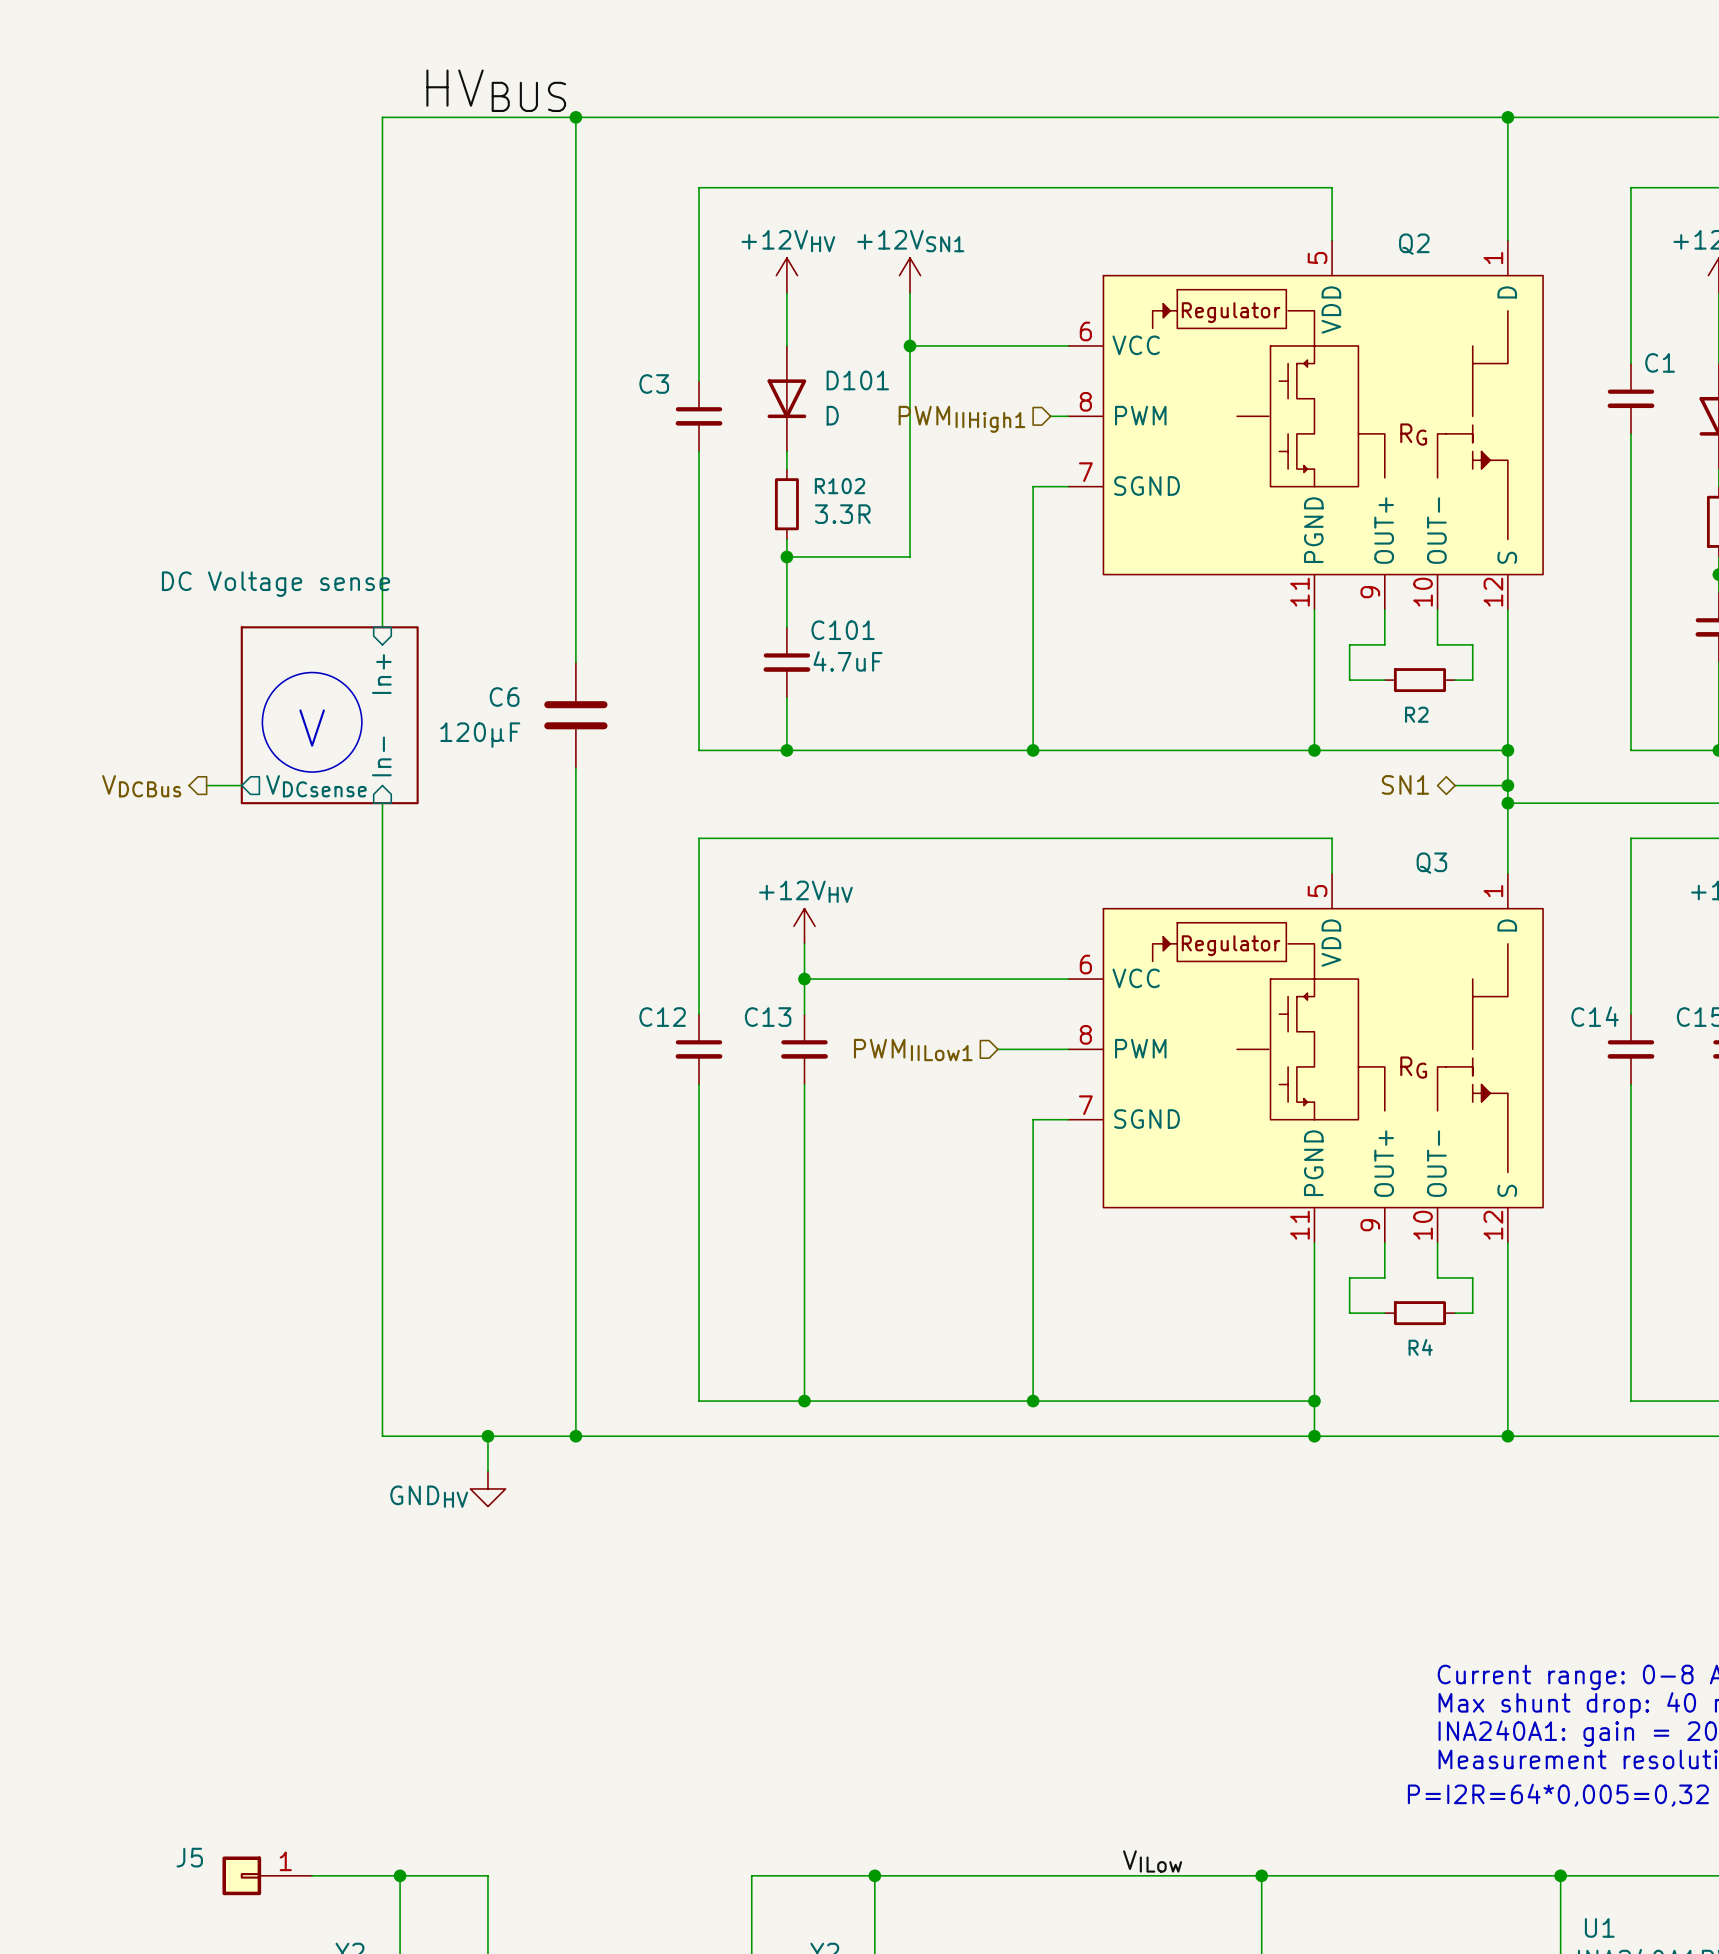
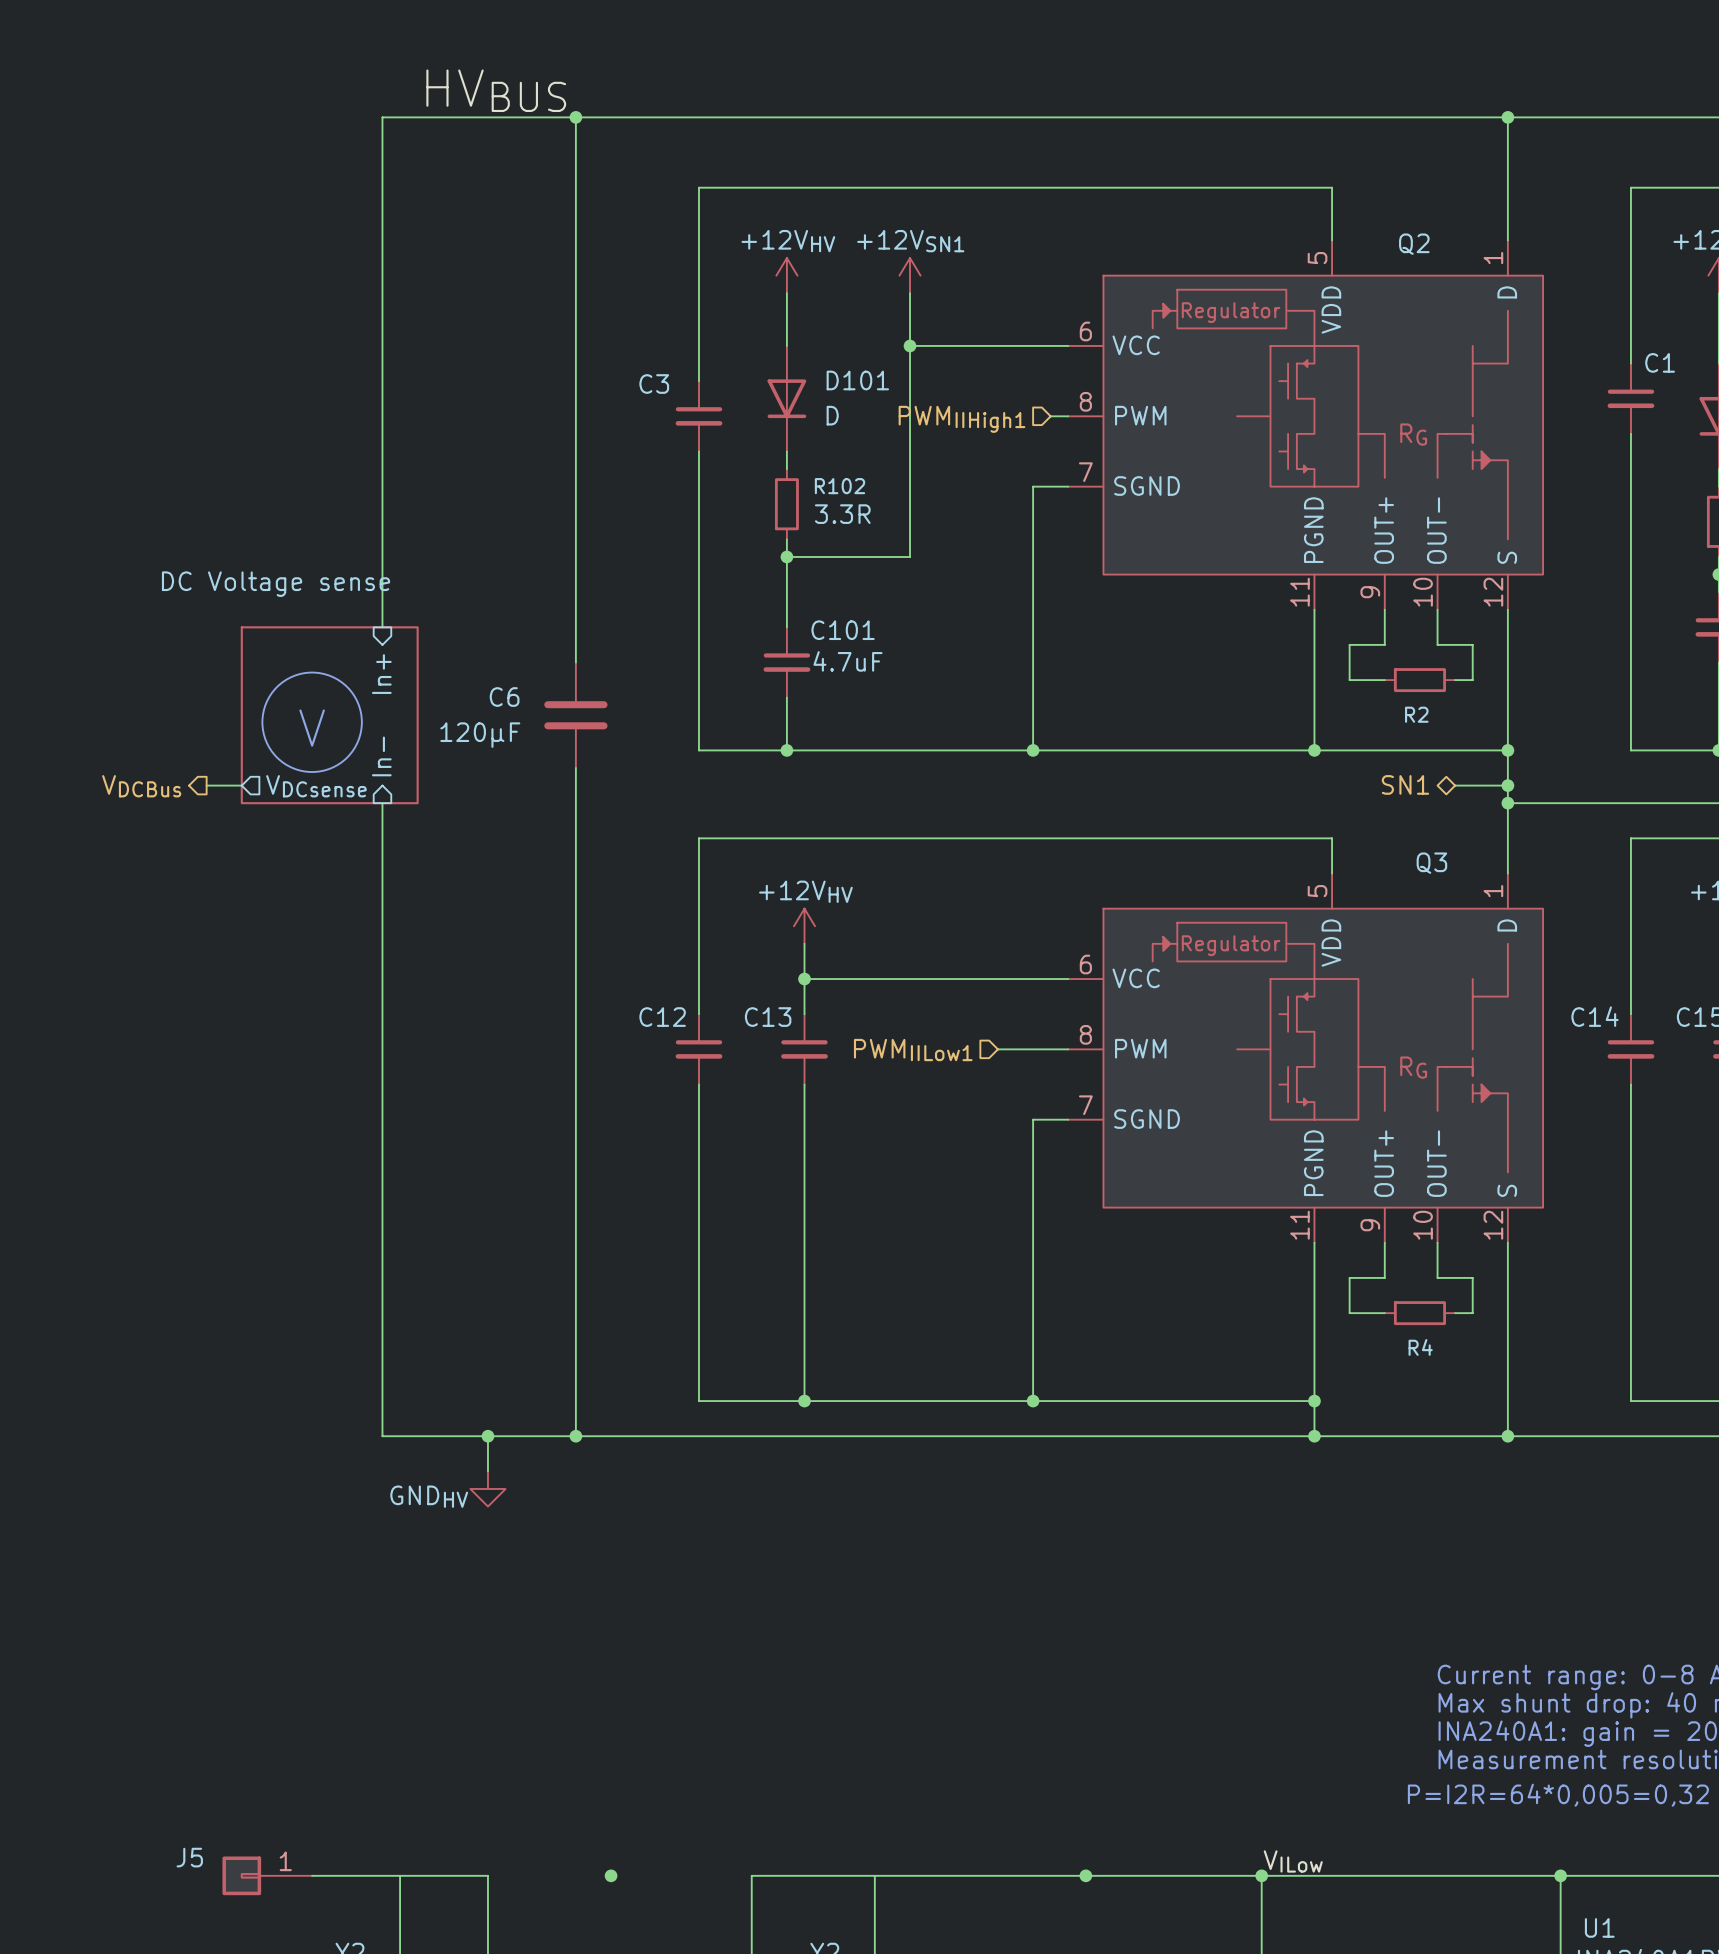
label position: VILow (1152, 1861) -> VILow (1293, 1861)
junction: (400, 1875) -> none
junction: none -> (611, 1875)
junction: (874, 1875) -> none
junction: none -> (1085, 1875)

